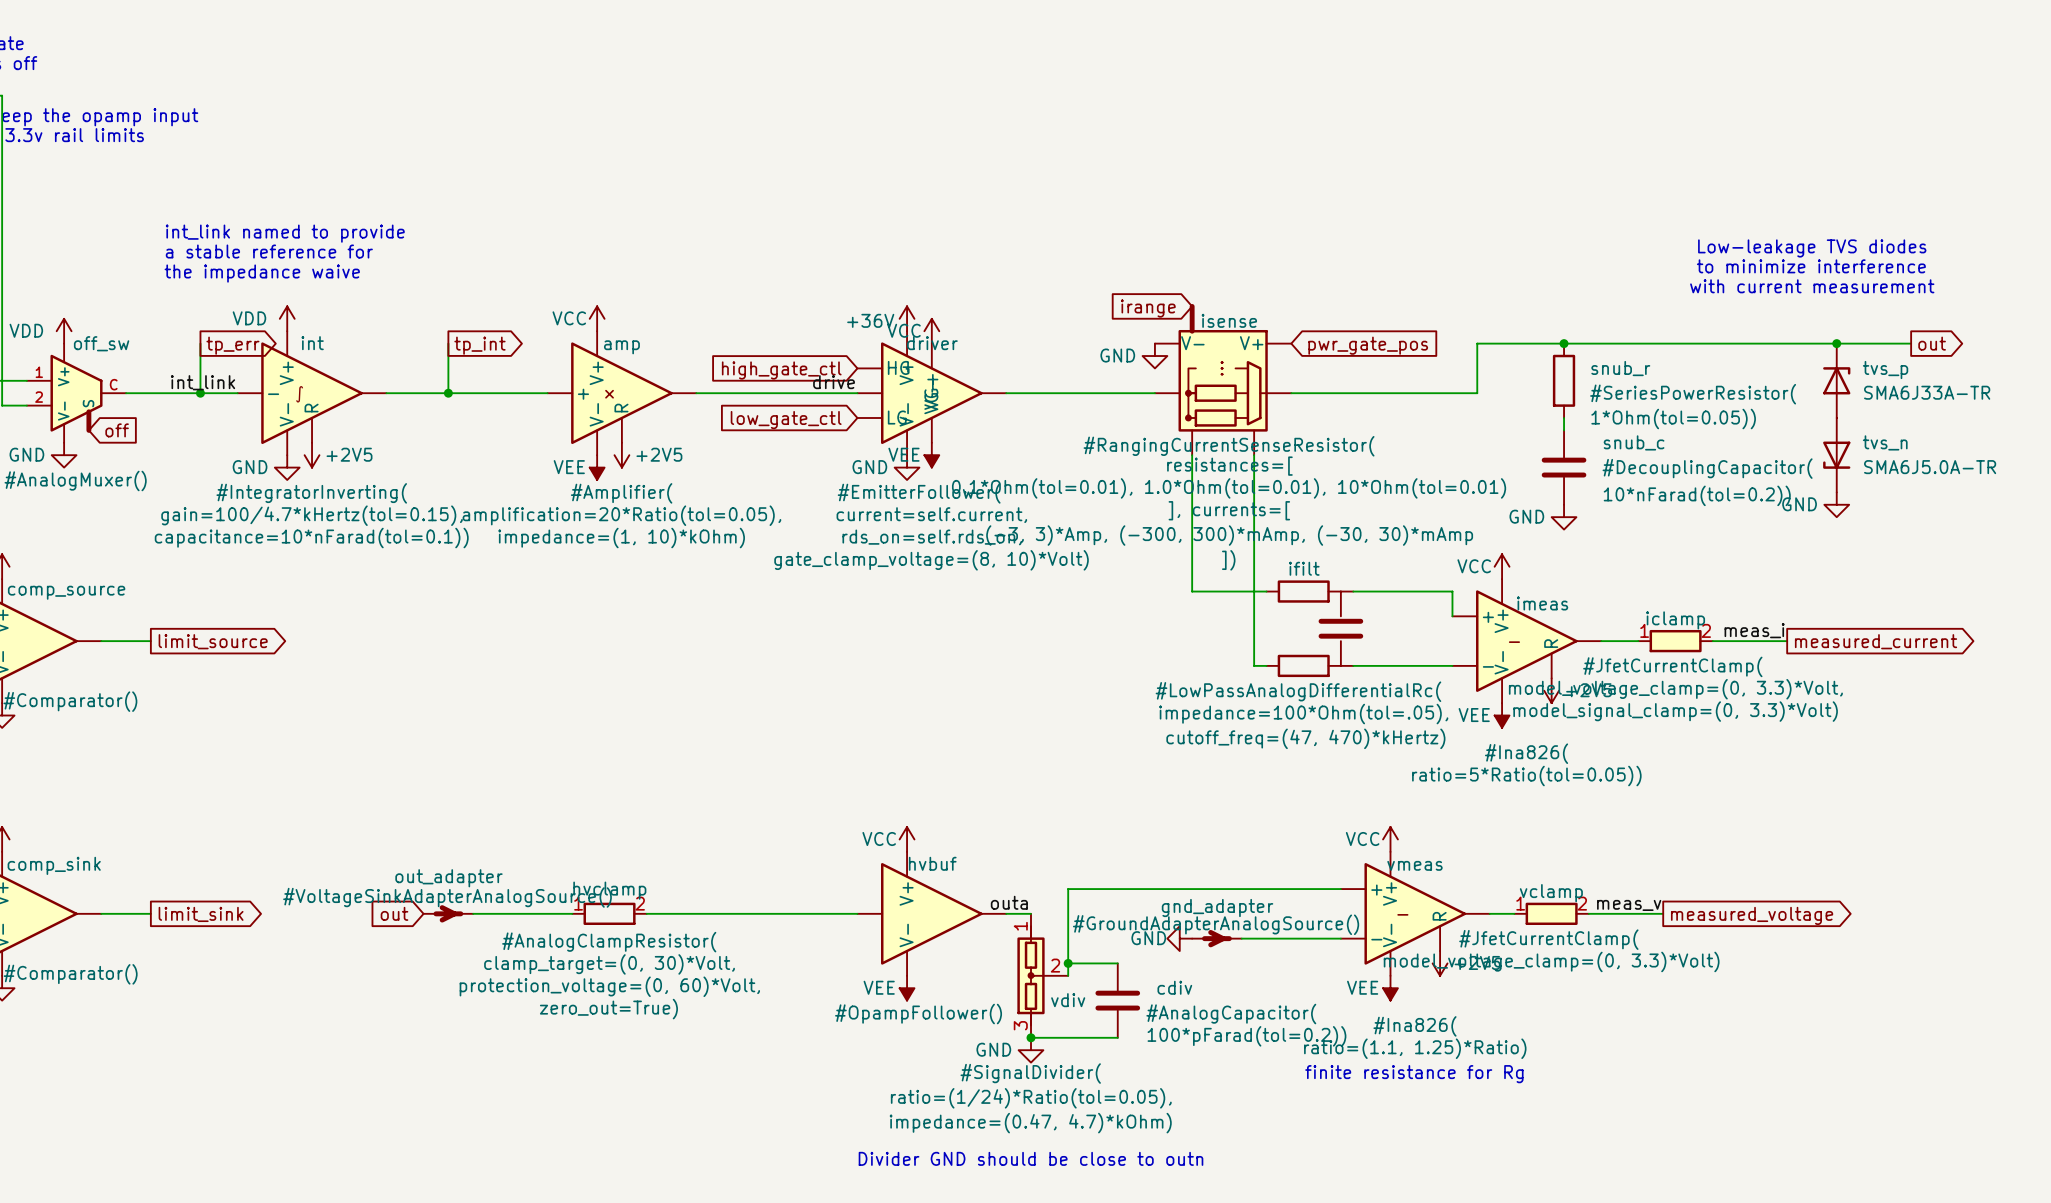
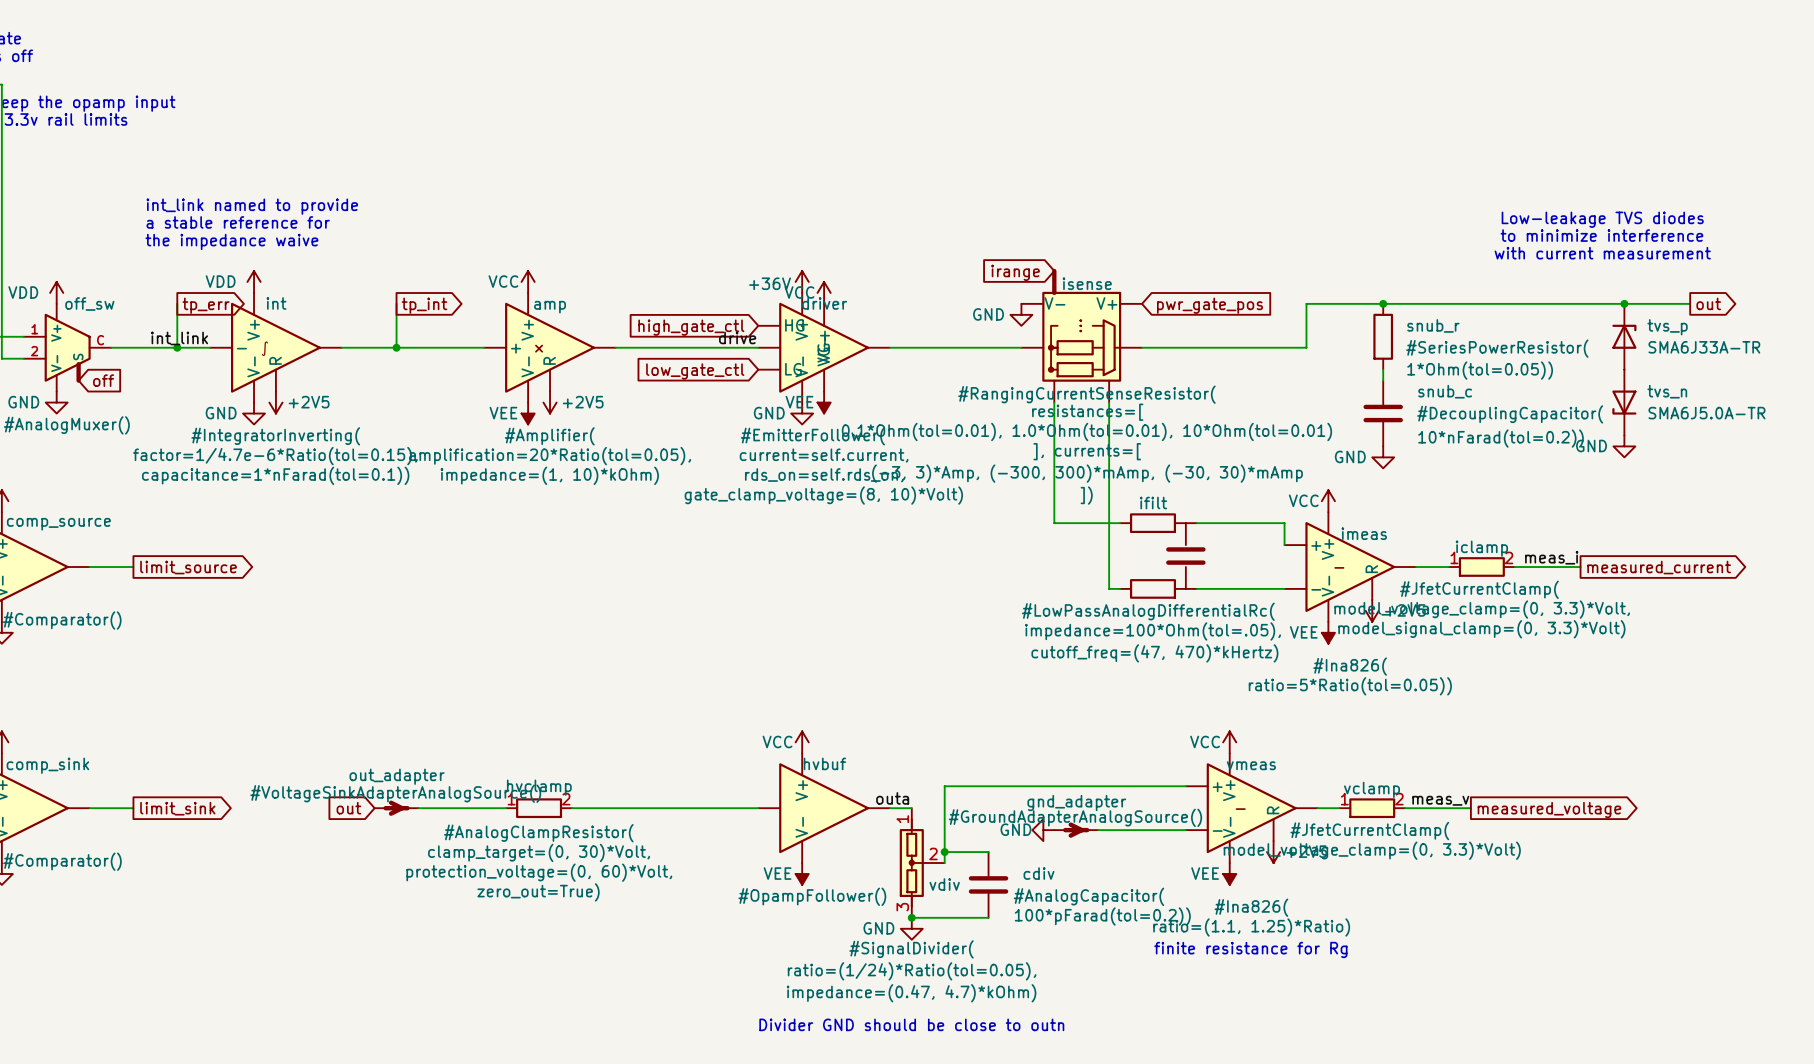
int text: gain=100/4.7*kHertz(tol=0.15), (312, 515) -> factor=1/4.7e-6*Ratio(tol=0.15), (275, 456)
int text: capacitance=10*nFarad(tol=0.1)) (311, 538) -> capacitance=1*nFarad(tol=0.1)) (275, 475)

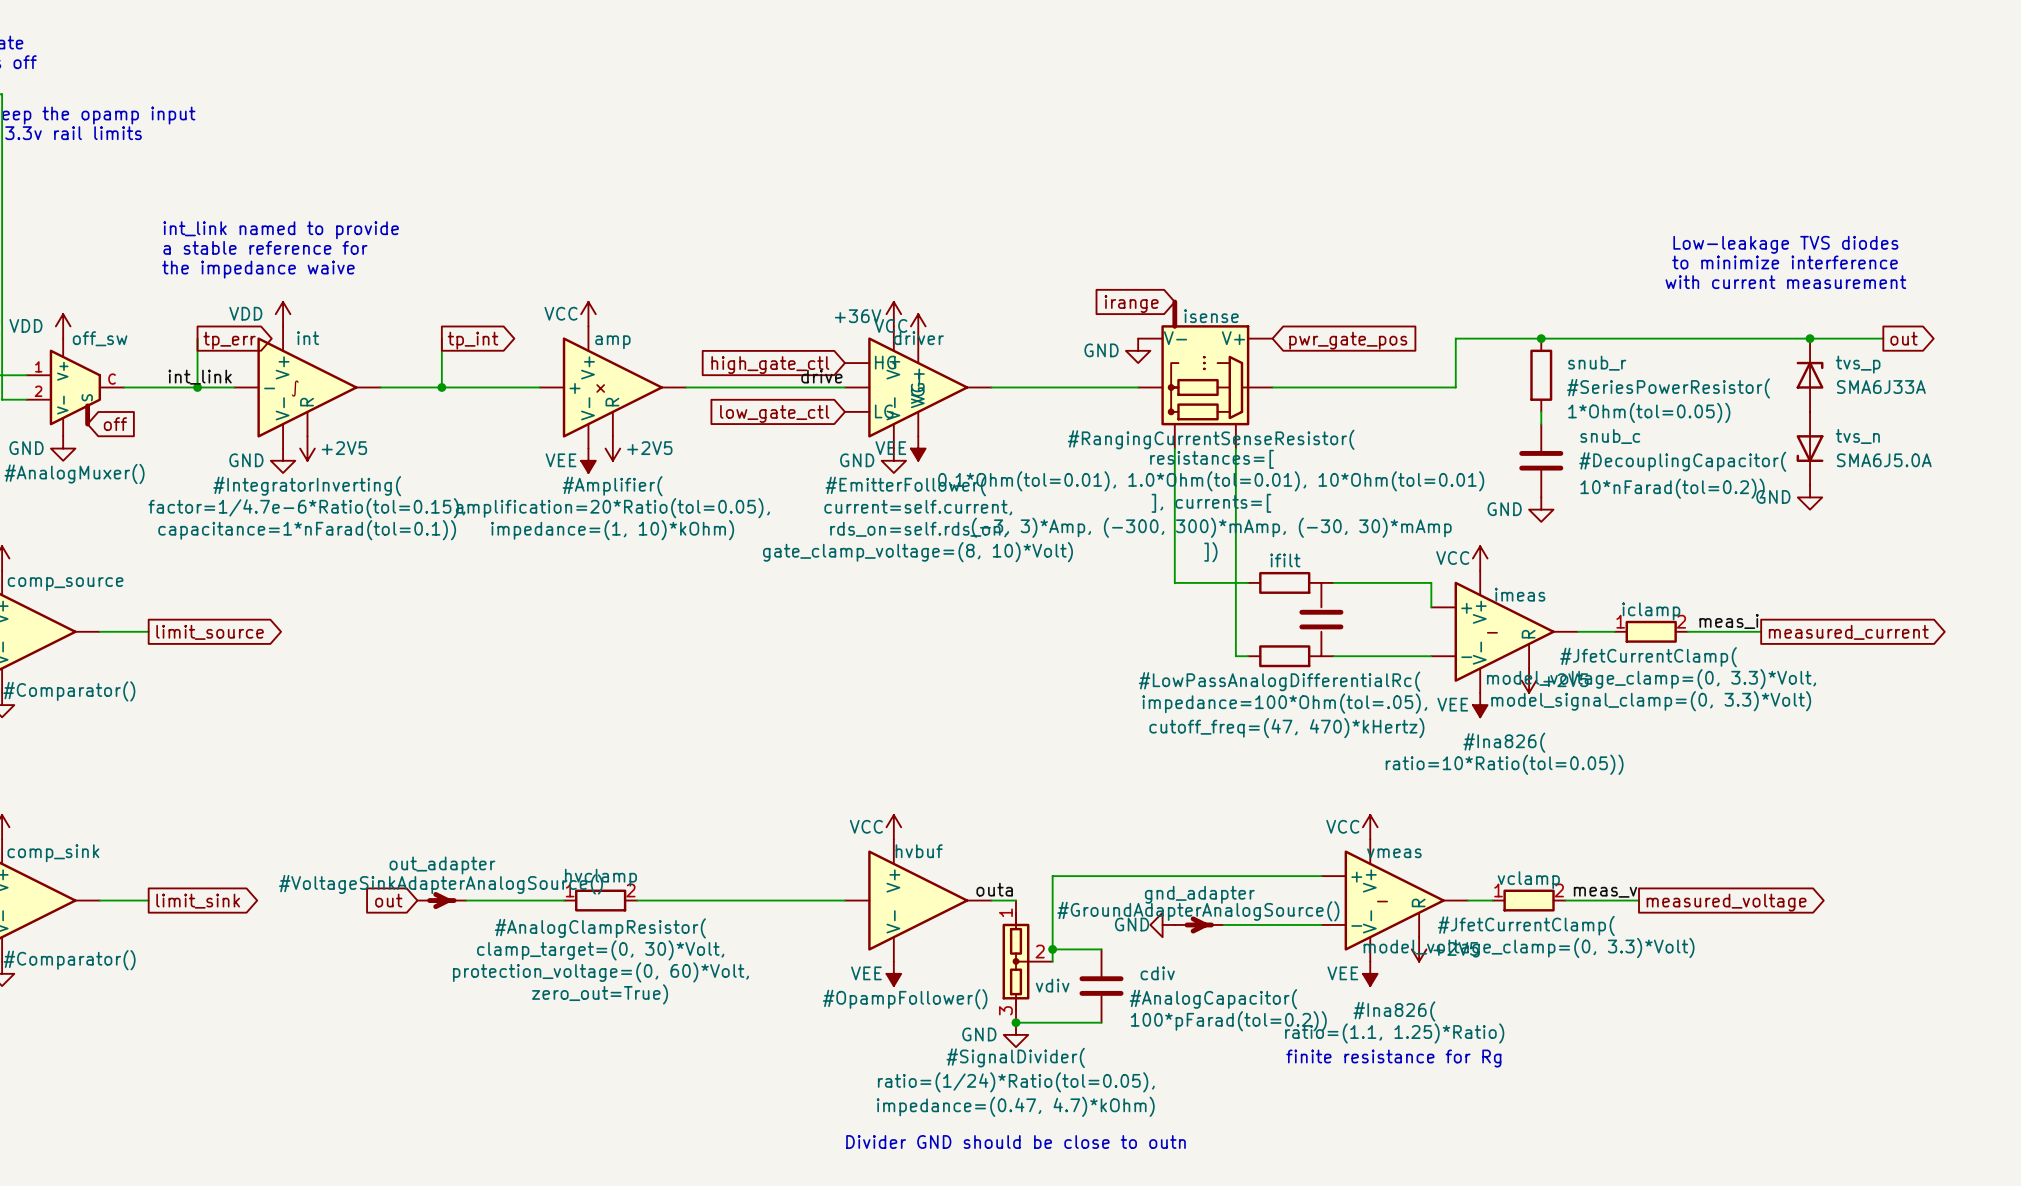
tvs_p value: SMA6J33A-TR (1704, 347) -> SMA6J33A (1881, 387)
tvs_n value: SMA6J5.0A-TR (1706, 413) -> SMA6J5.0A (1884, 460)
imeas text: ratio=5*Ratio(tol=0.05)) (1350, 686) -> ratio=10*Ratio(tol=0.05)) (1504, 764)

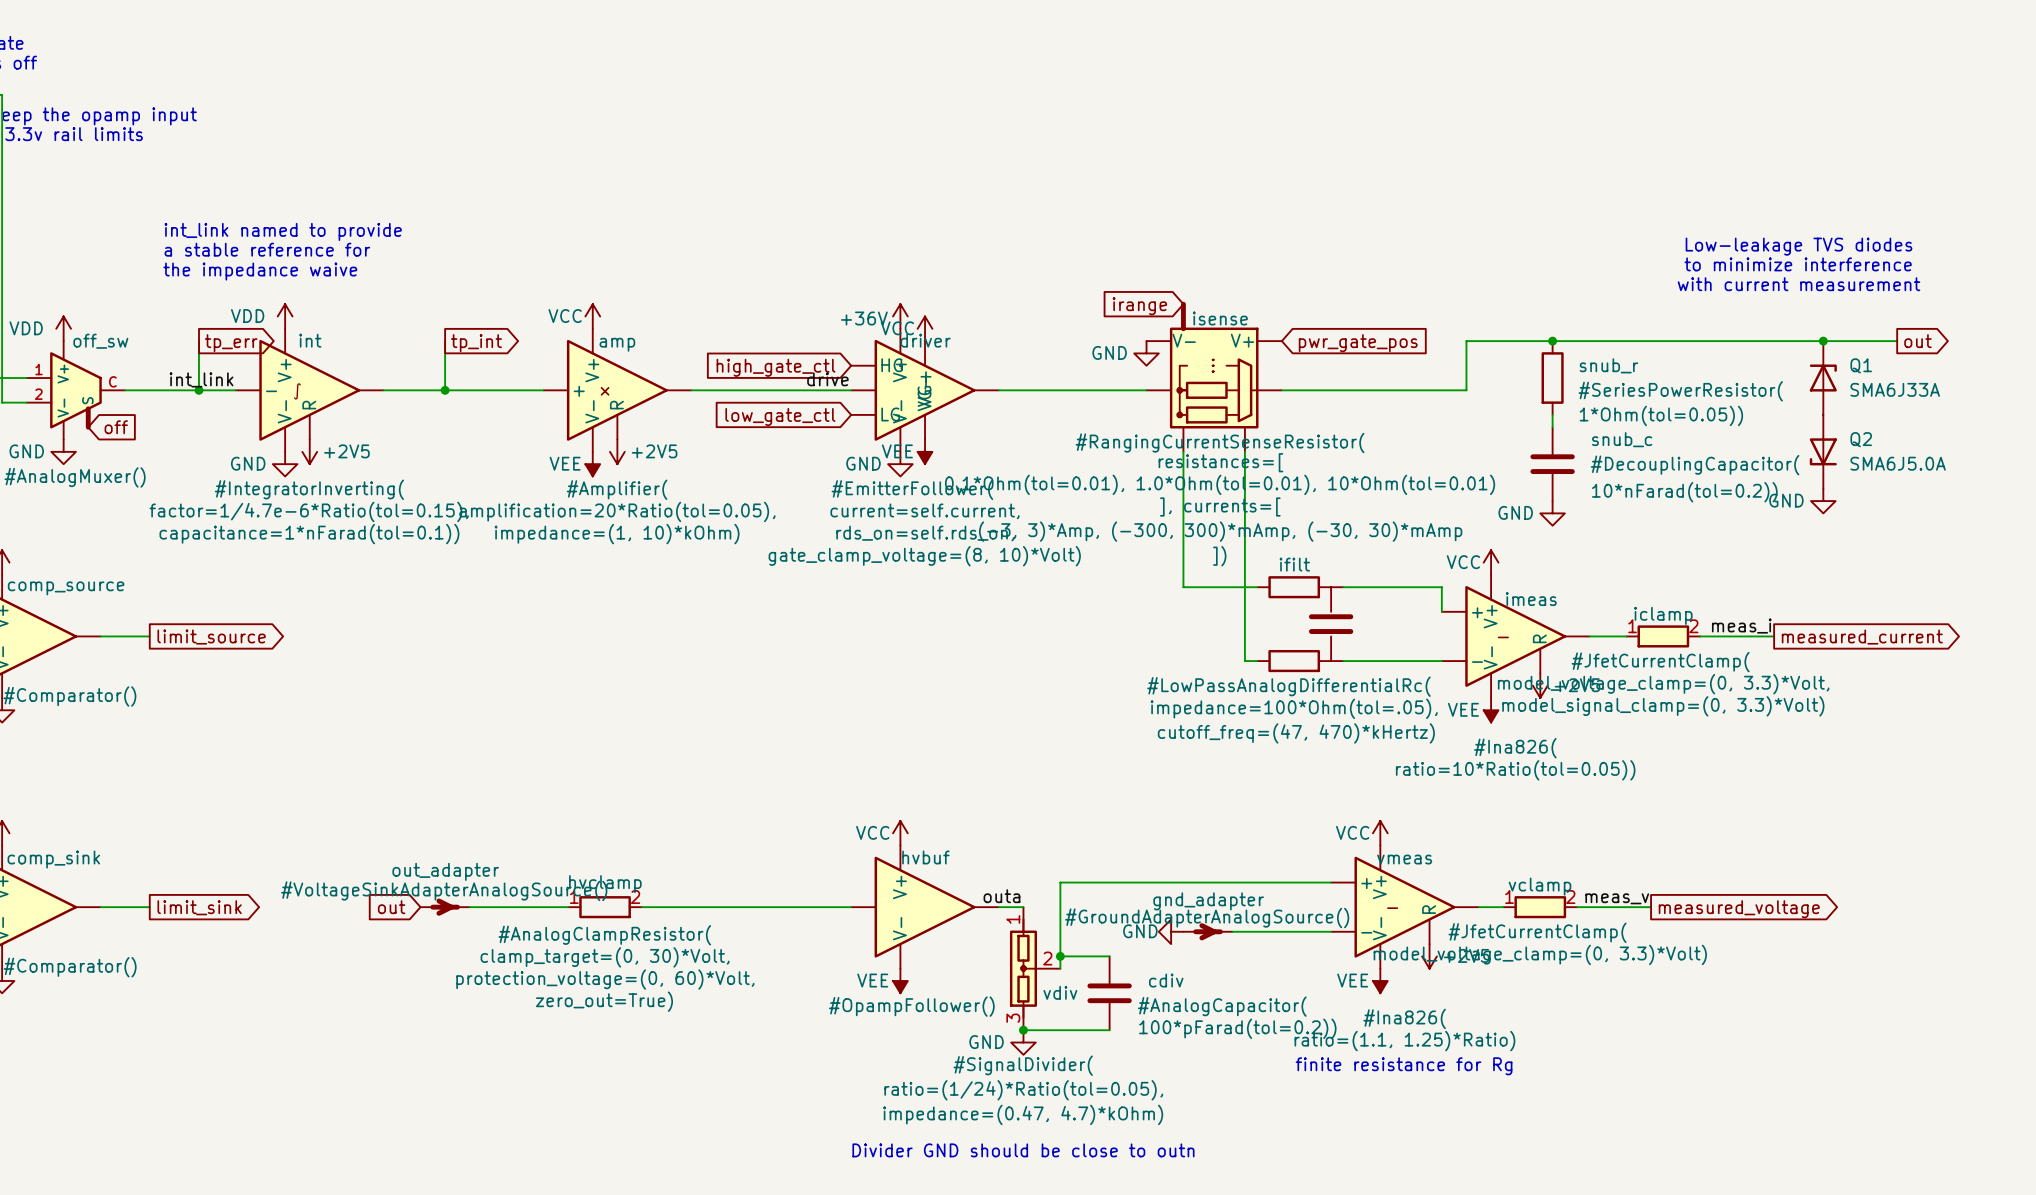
tvs_p name: tvs_p (1858, 364) -> Q1 (1861, 365)
tvs_n name: tvs_n (1857, 436) -> Q2 (1861, 439)

